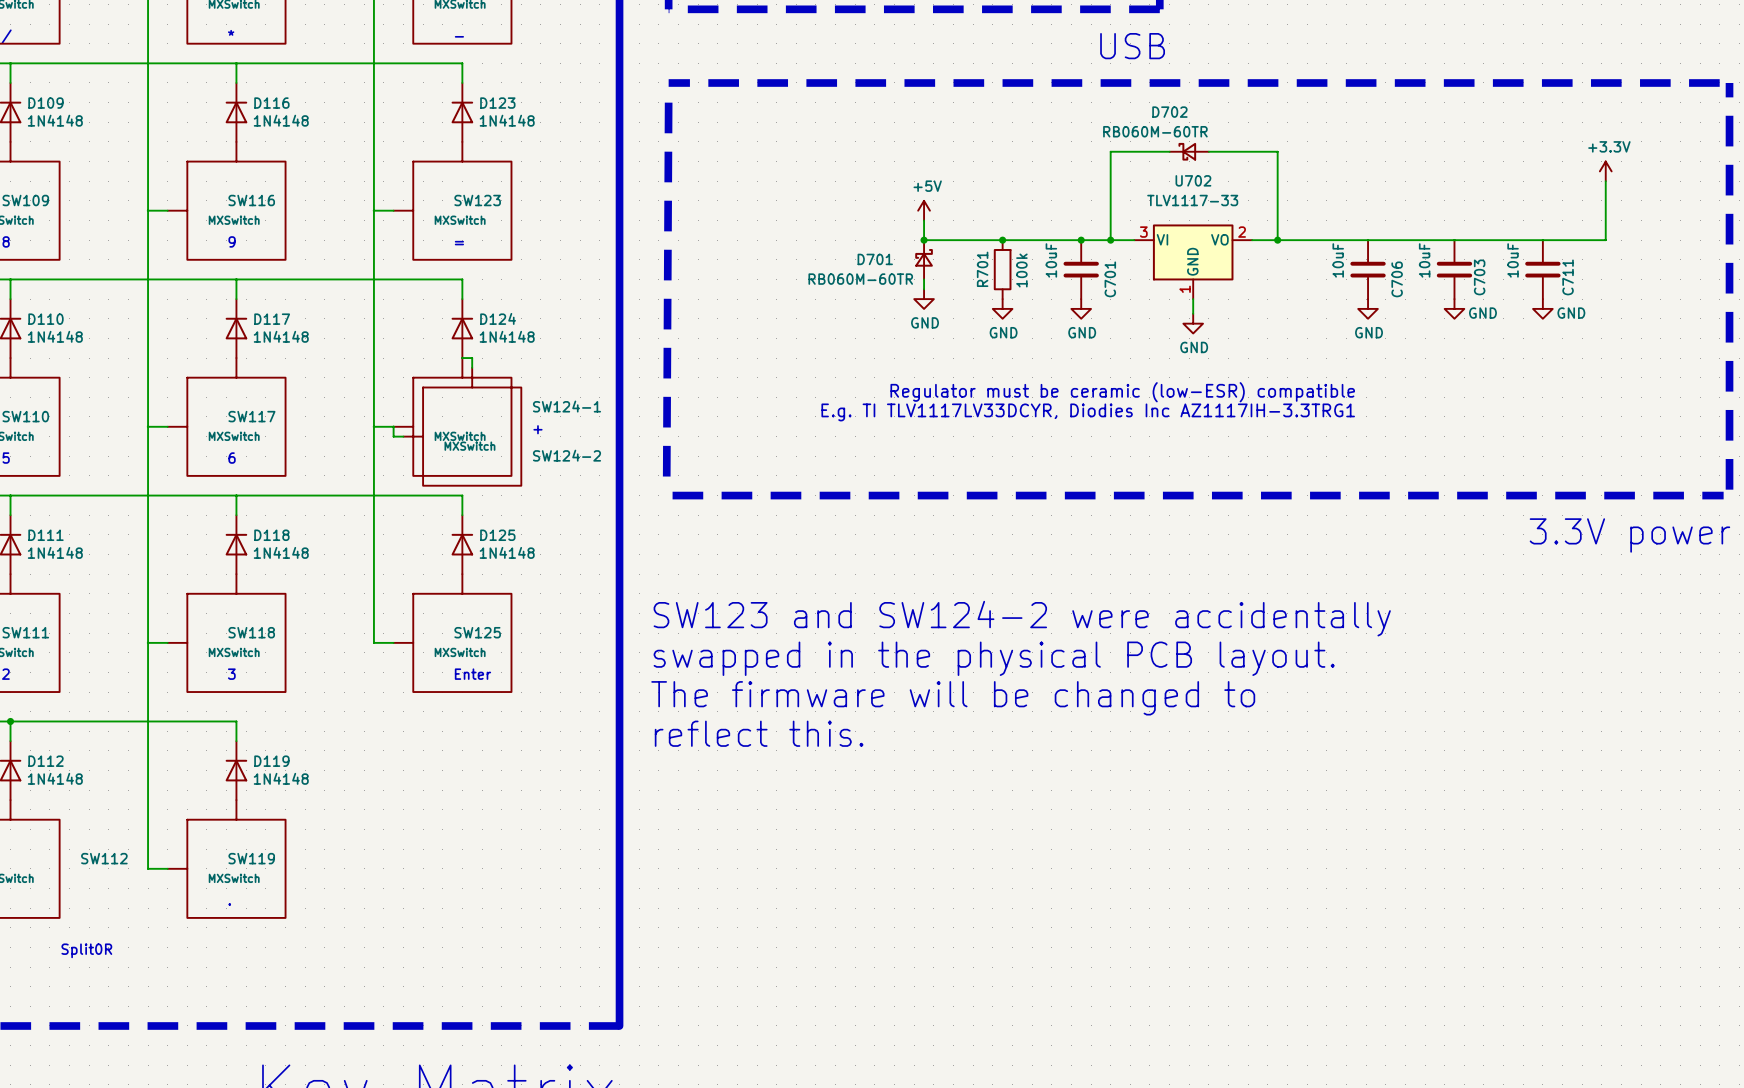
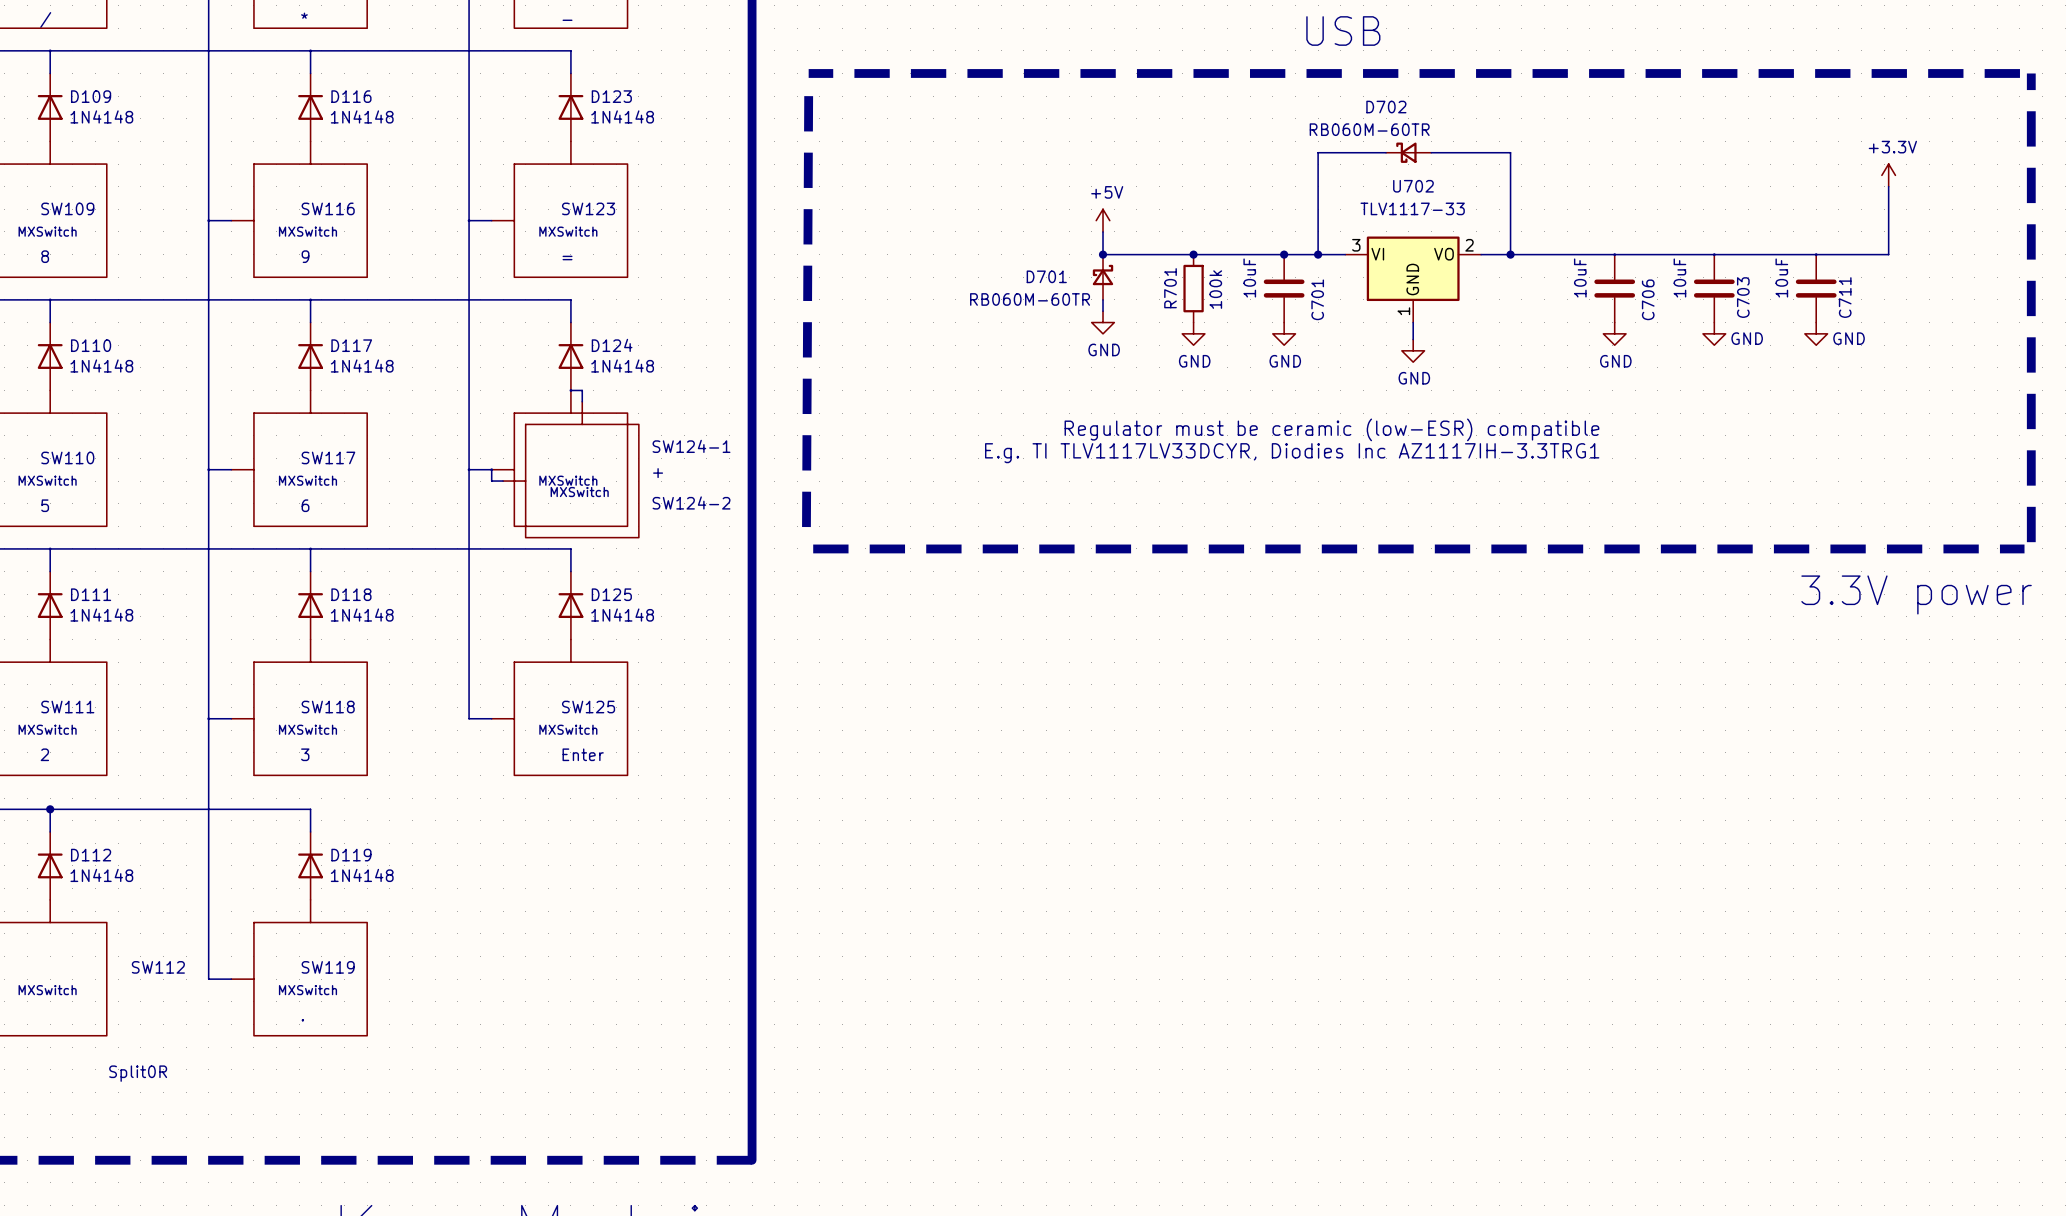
text: SW123 and SW124-2 were accidentally (1022, 618) -> none
text: swapped in the physical PCB layout. (994, 658) -> none
text: The firmware will be changed to (953, 698) -> none
text: reflect this. (759, 733) -> none

